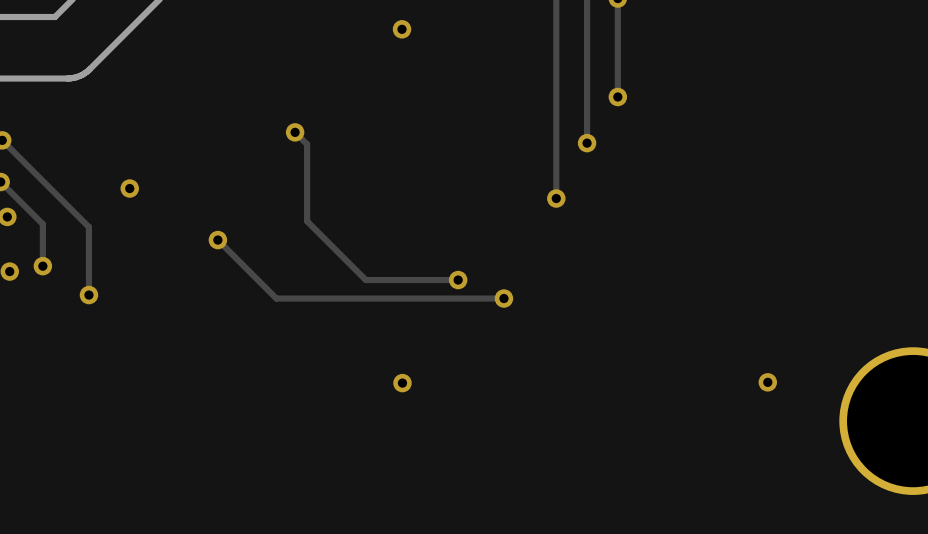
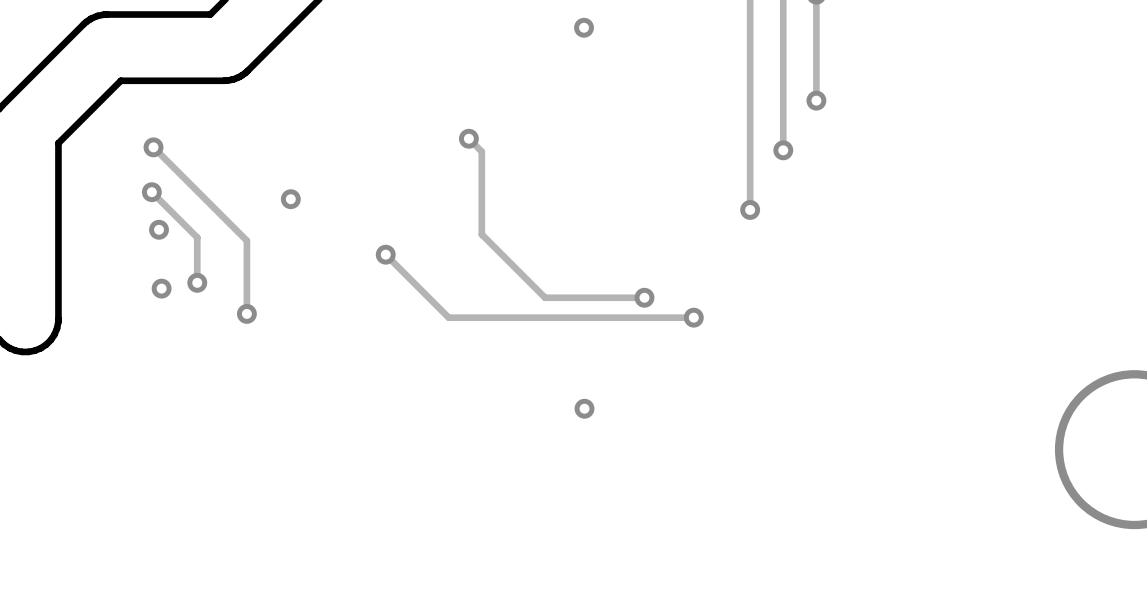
via: (767, 382) -> none

